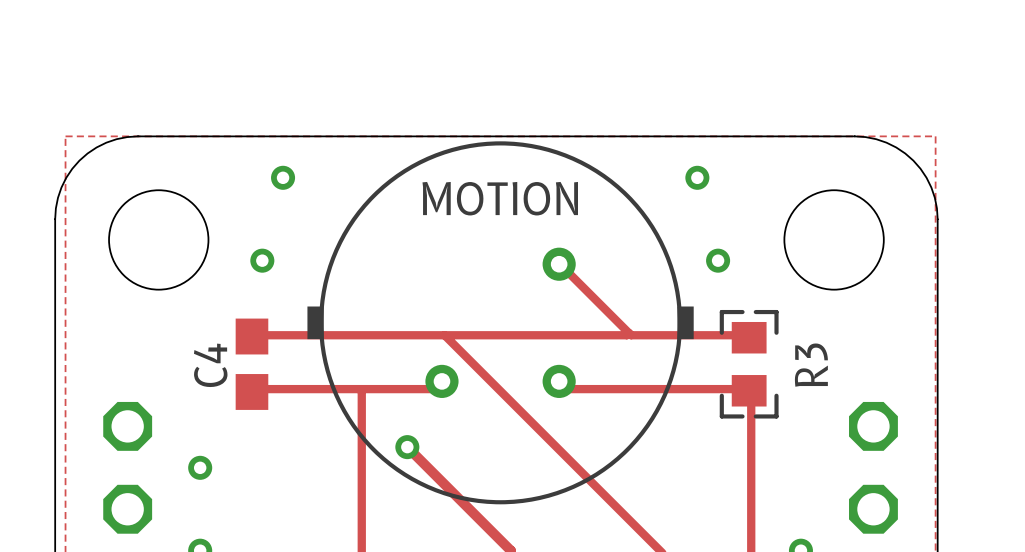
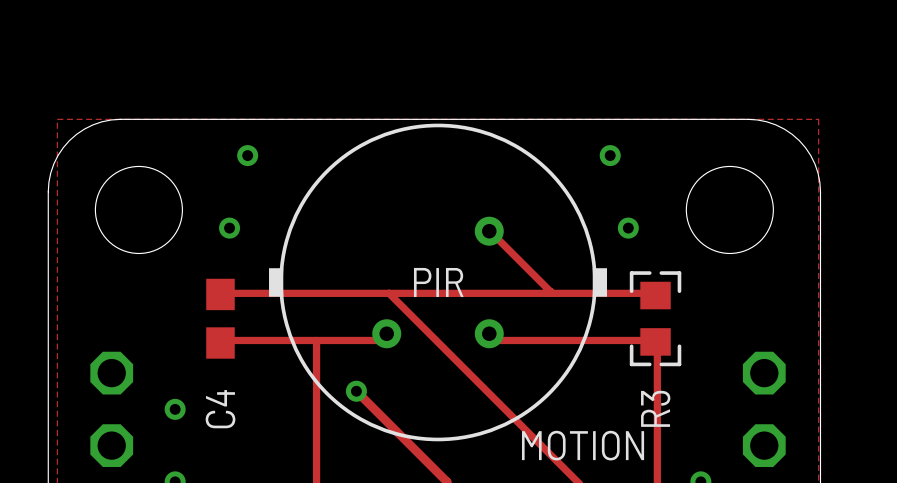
MOTION name position: MOTION (500, 198) -> MOTION (583, 445)
MOTION value: none -> PIR (438, 282)
C4 name position: C4 (210, 365) -> C4 (220, 409)
R3 name position: R3 (811, 365) -> R3 (655, 408)

